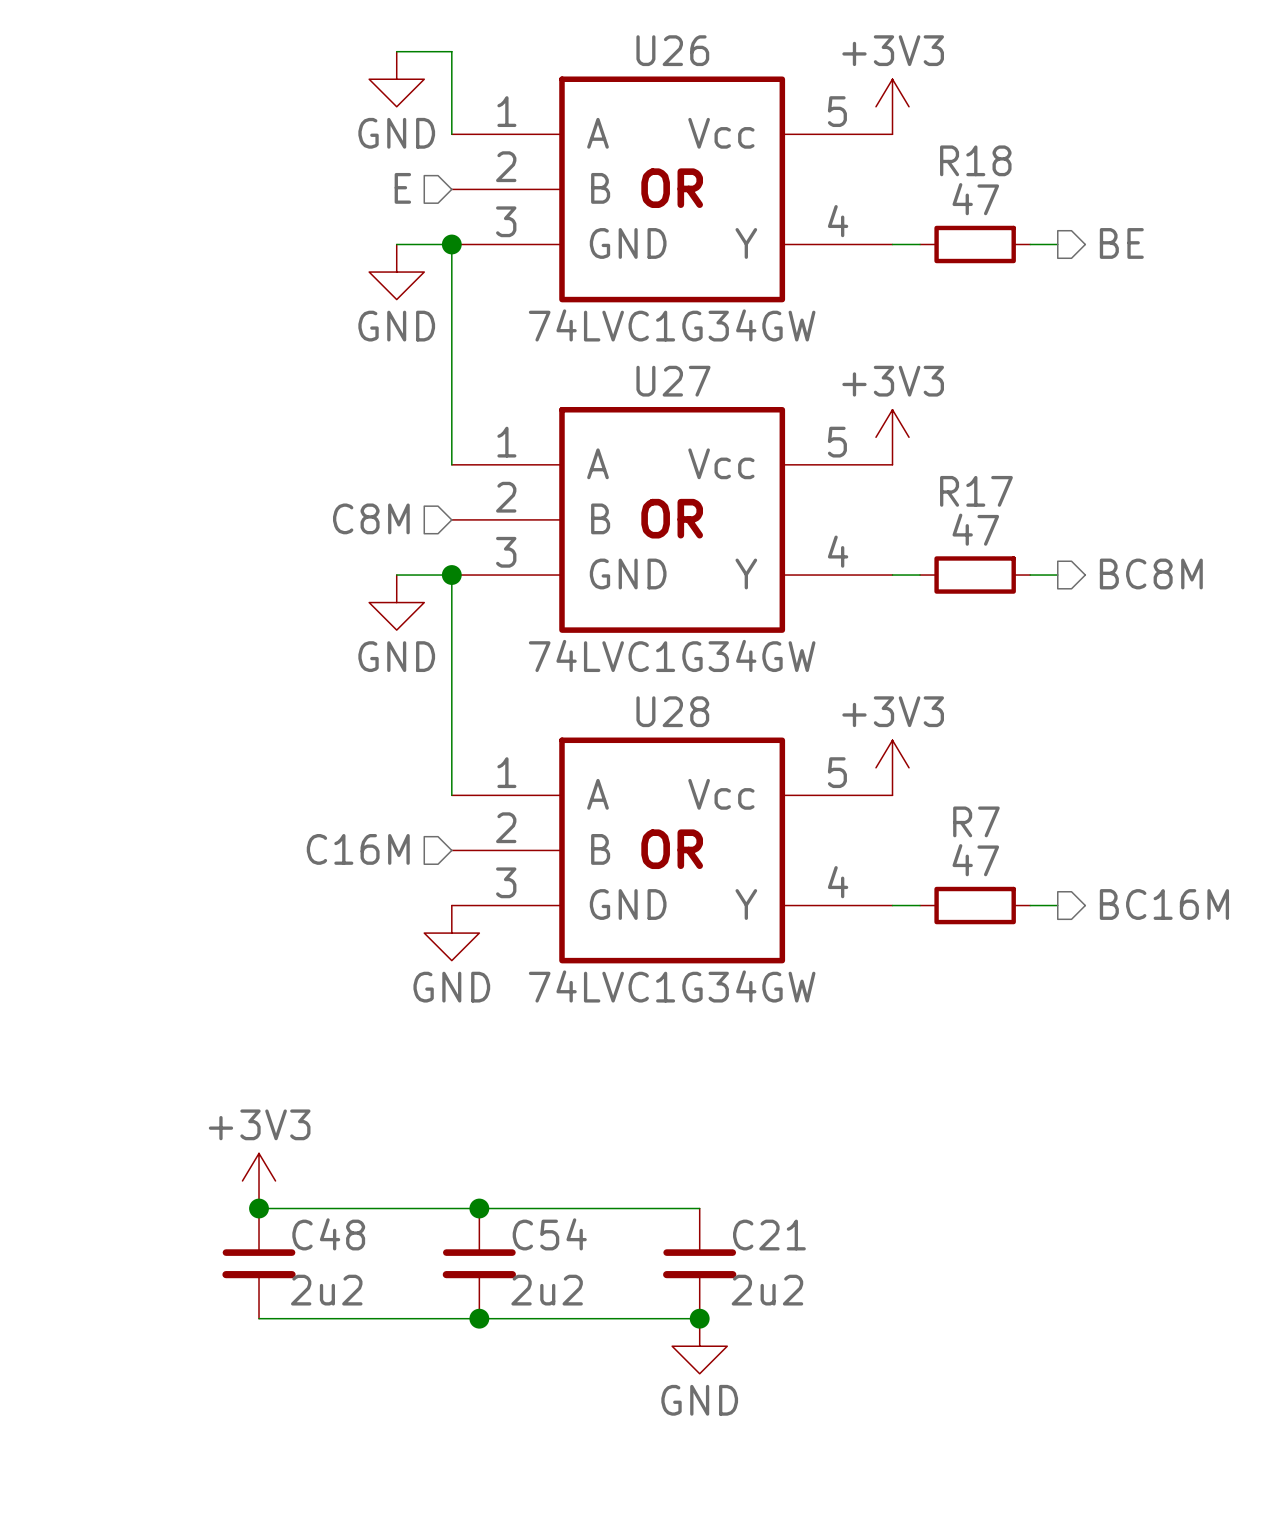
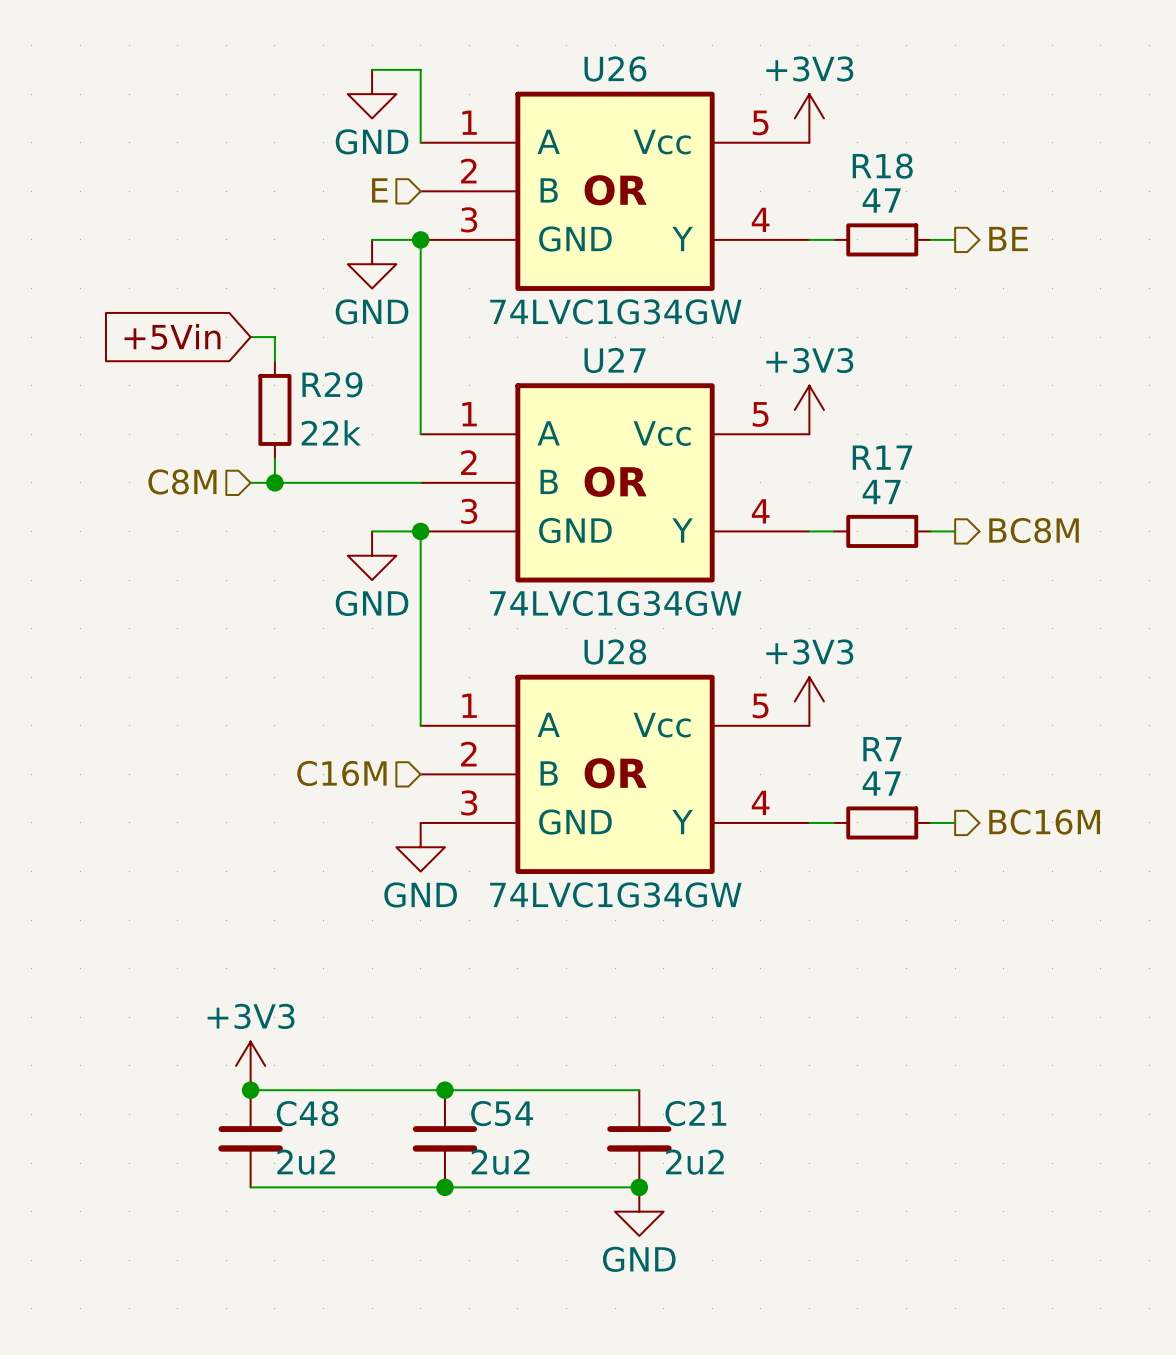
global label: none -> +5Vin (172, 336)
wire: none -> (250, 337) (274, 337) (274, 361)
R29: none -> 22k (274, 409)
wire: none -> (274, 458) (274, 482)
hierarchical label position: C8M (371, 518) -> C8M (182, 481)
wire: none -> (250, 482) (420, 482)
junction: none -> (274, 482)

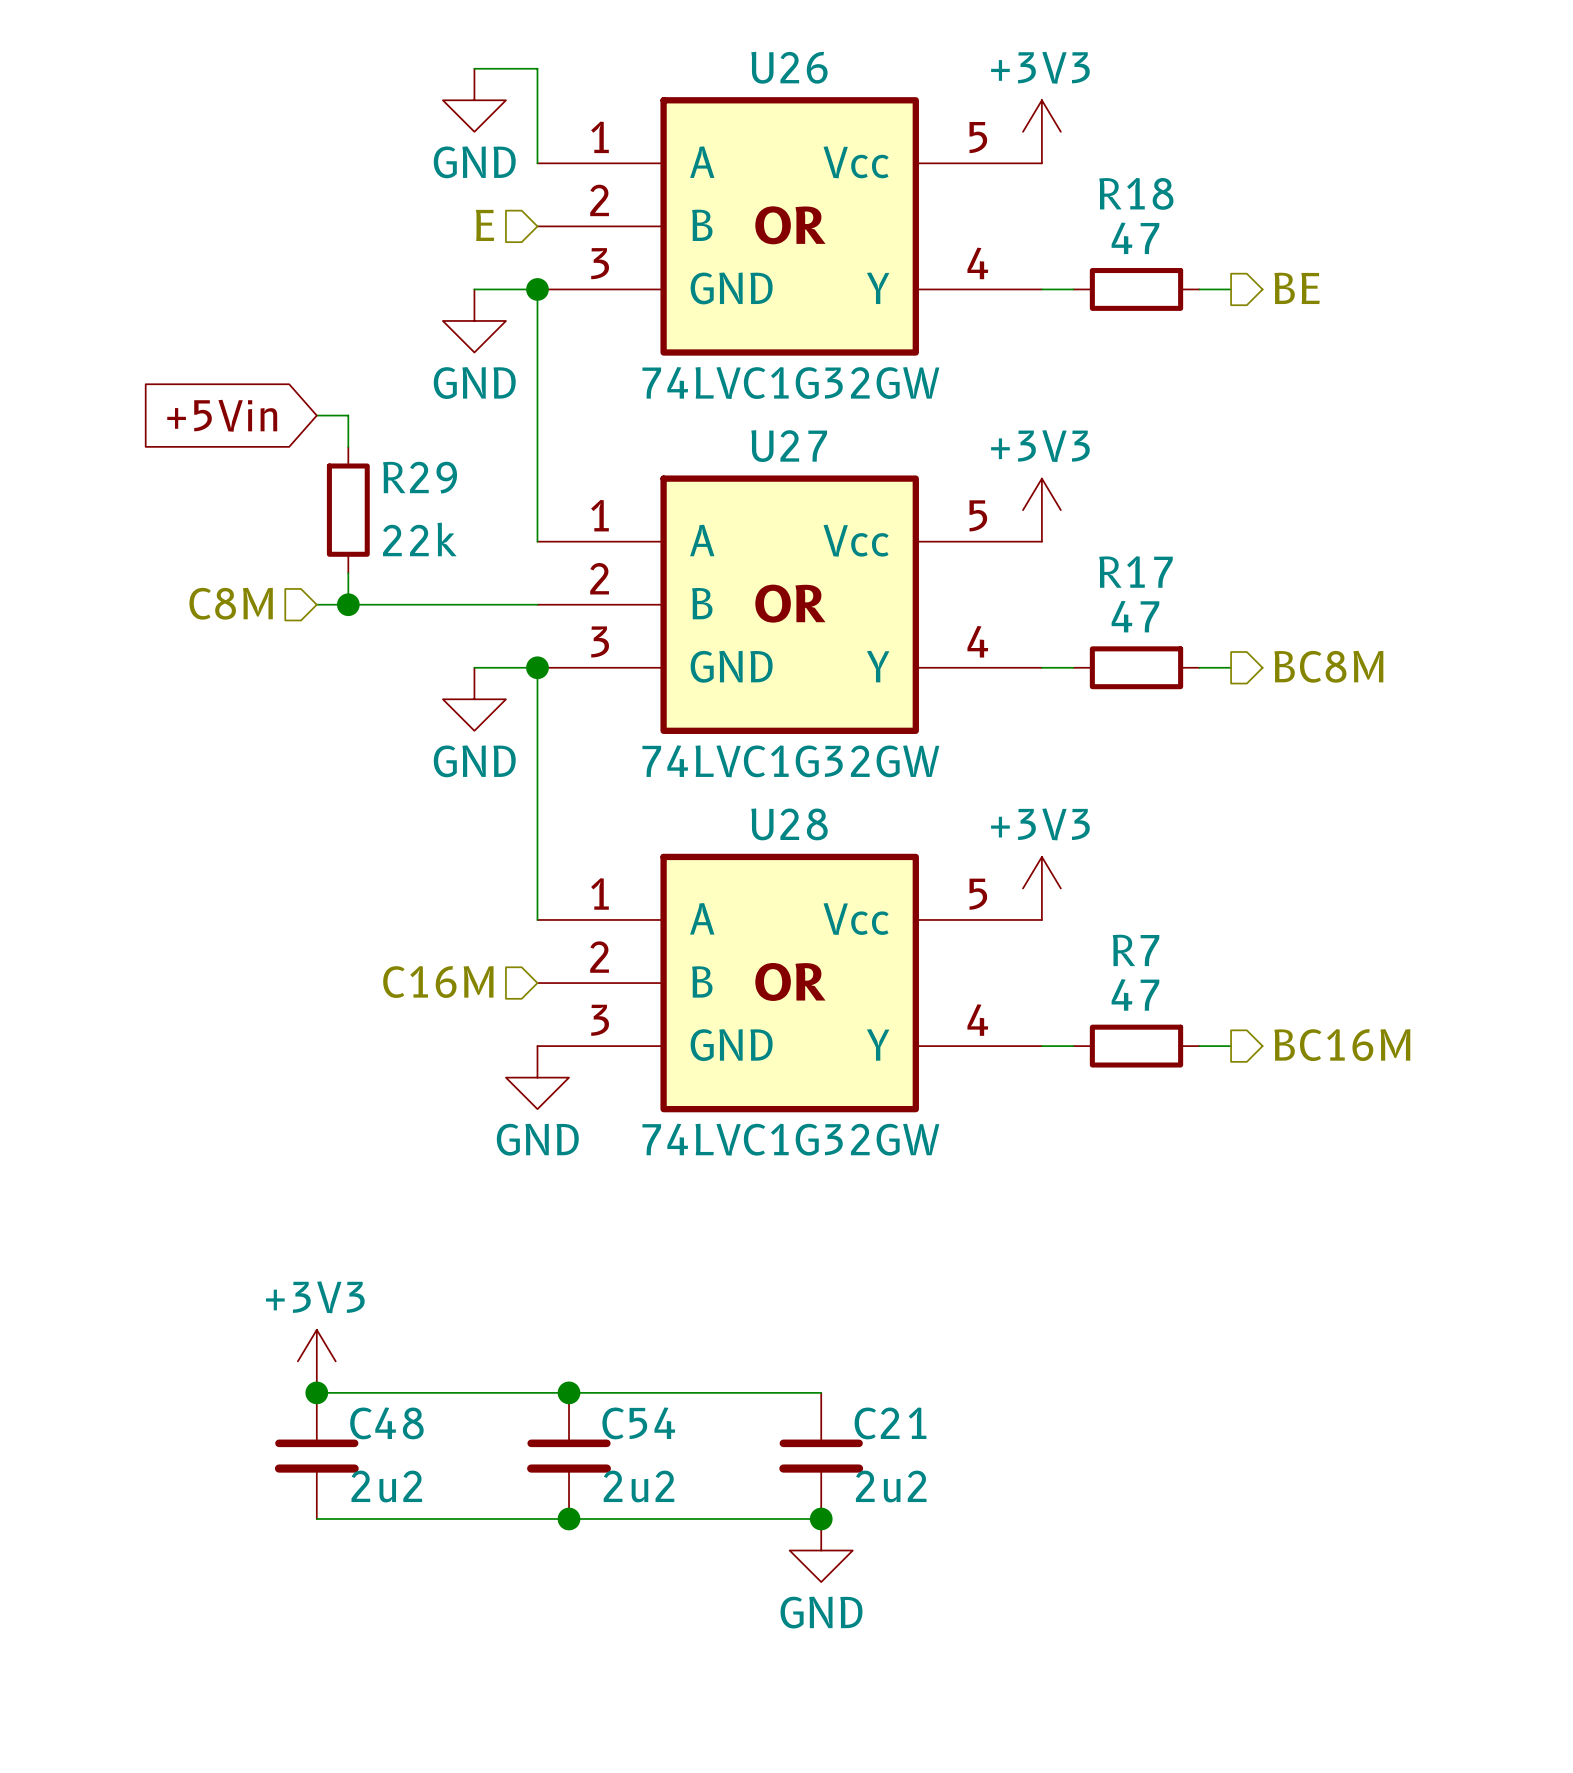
U26 value: 74LVC1G34GW (615, 311) -> 74LVC1G32GW (790, 383)
U27 value: 74LVC1G34GW (615, 603) -> 74LVC1G32GW (790, 761)
U28 value: 74LVC1G34GW (615, 894) -> 74LVC1G32GW (790, 1139)

